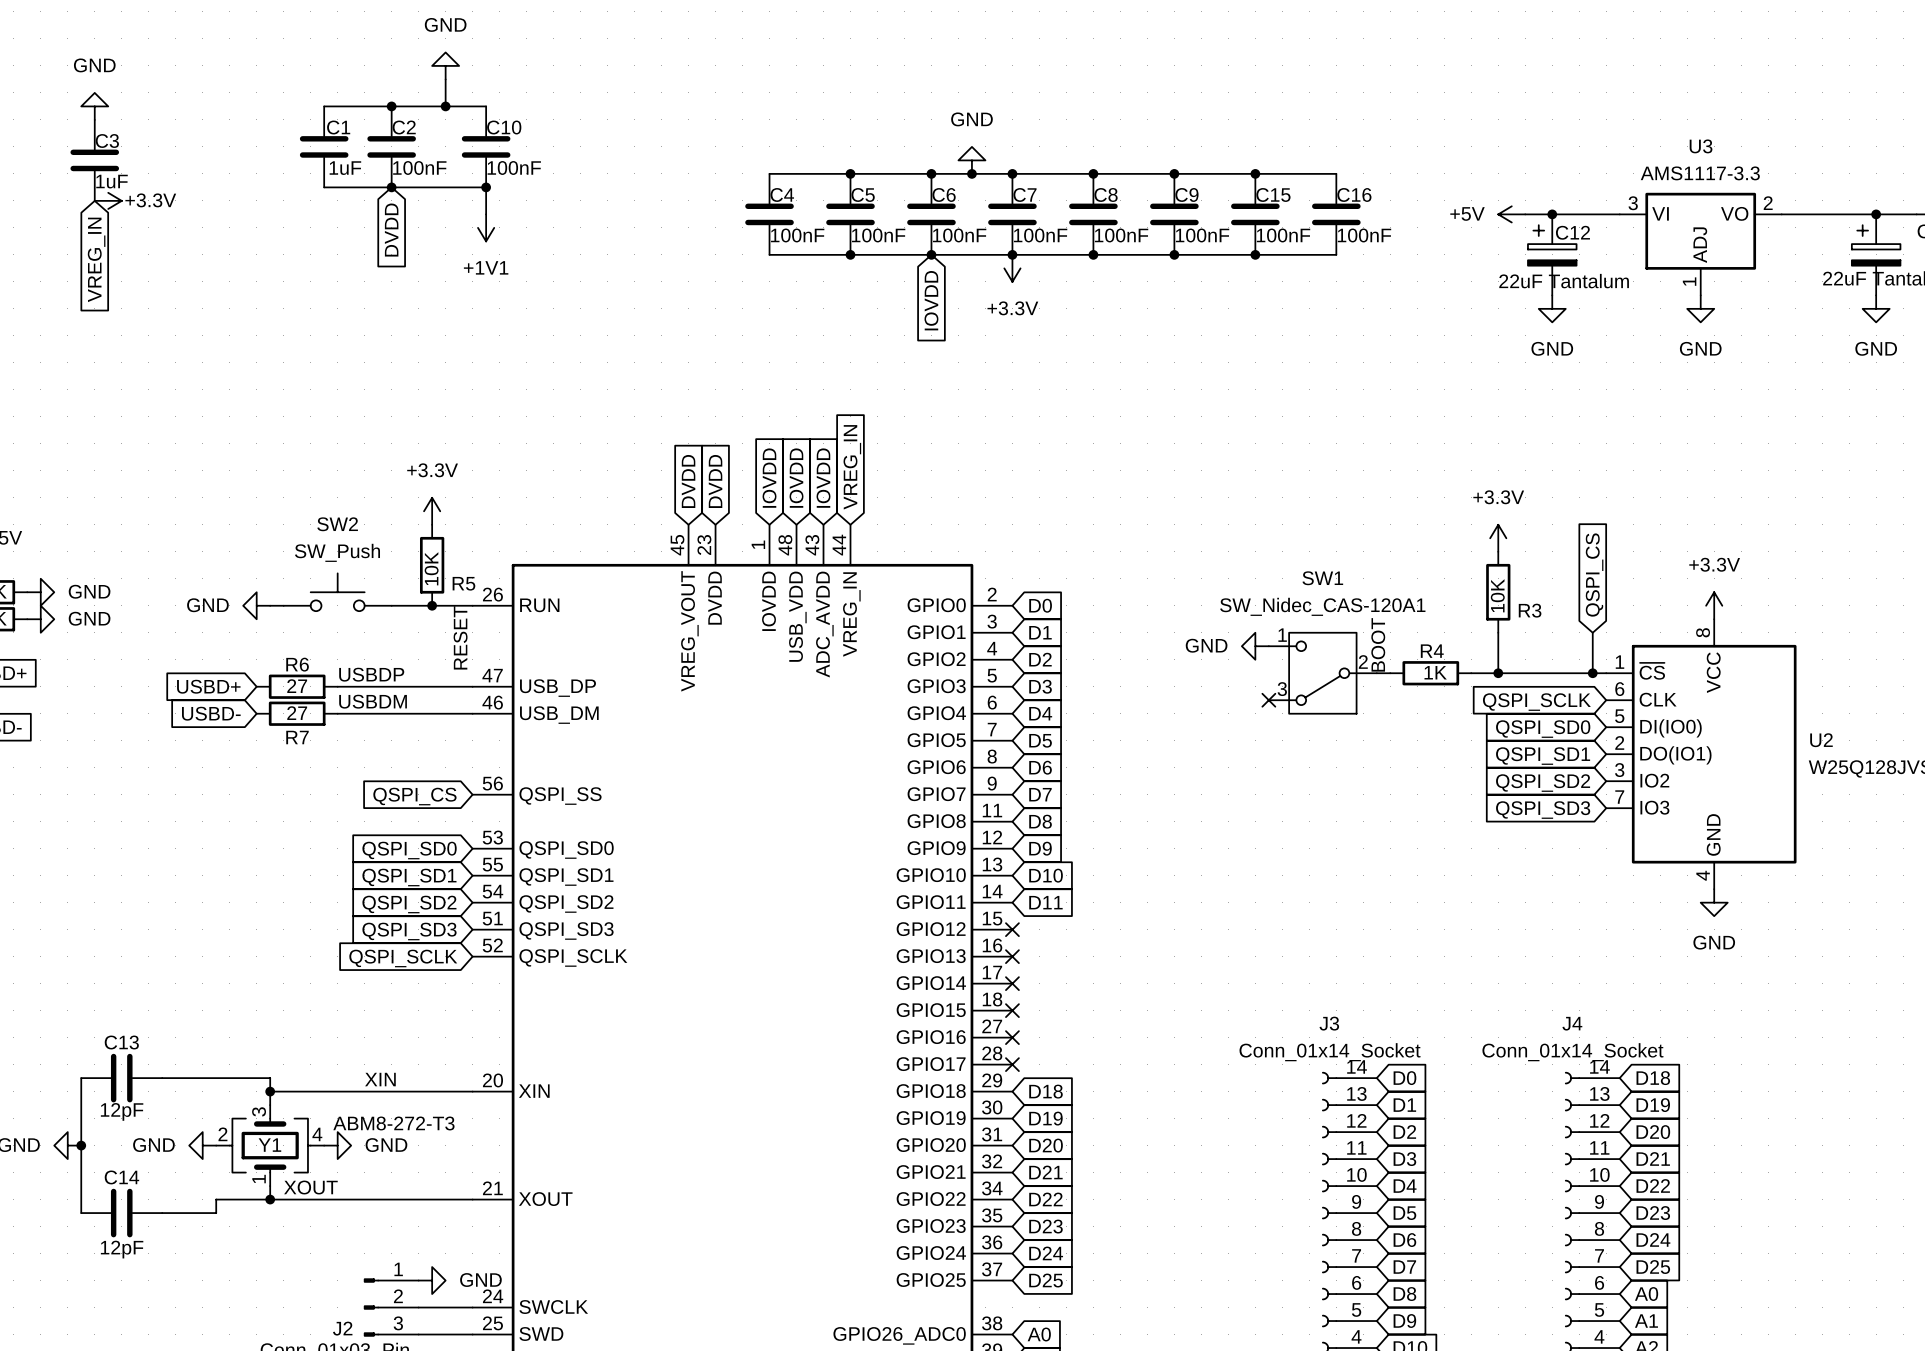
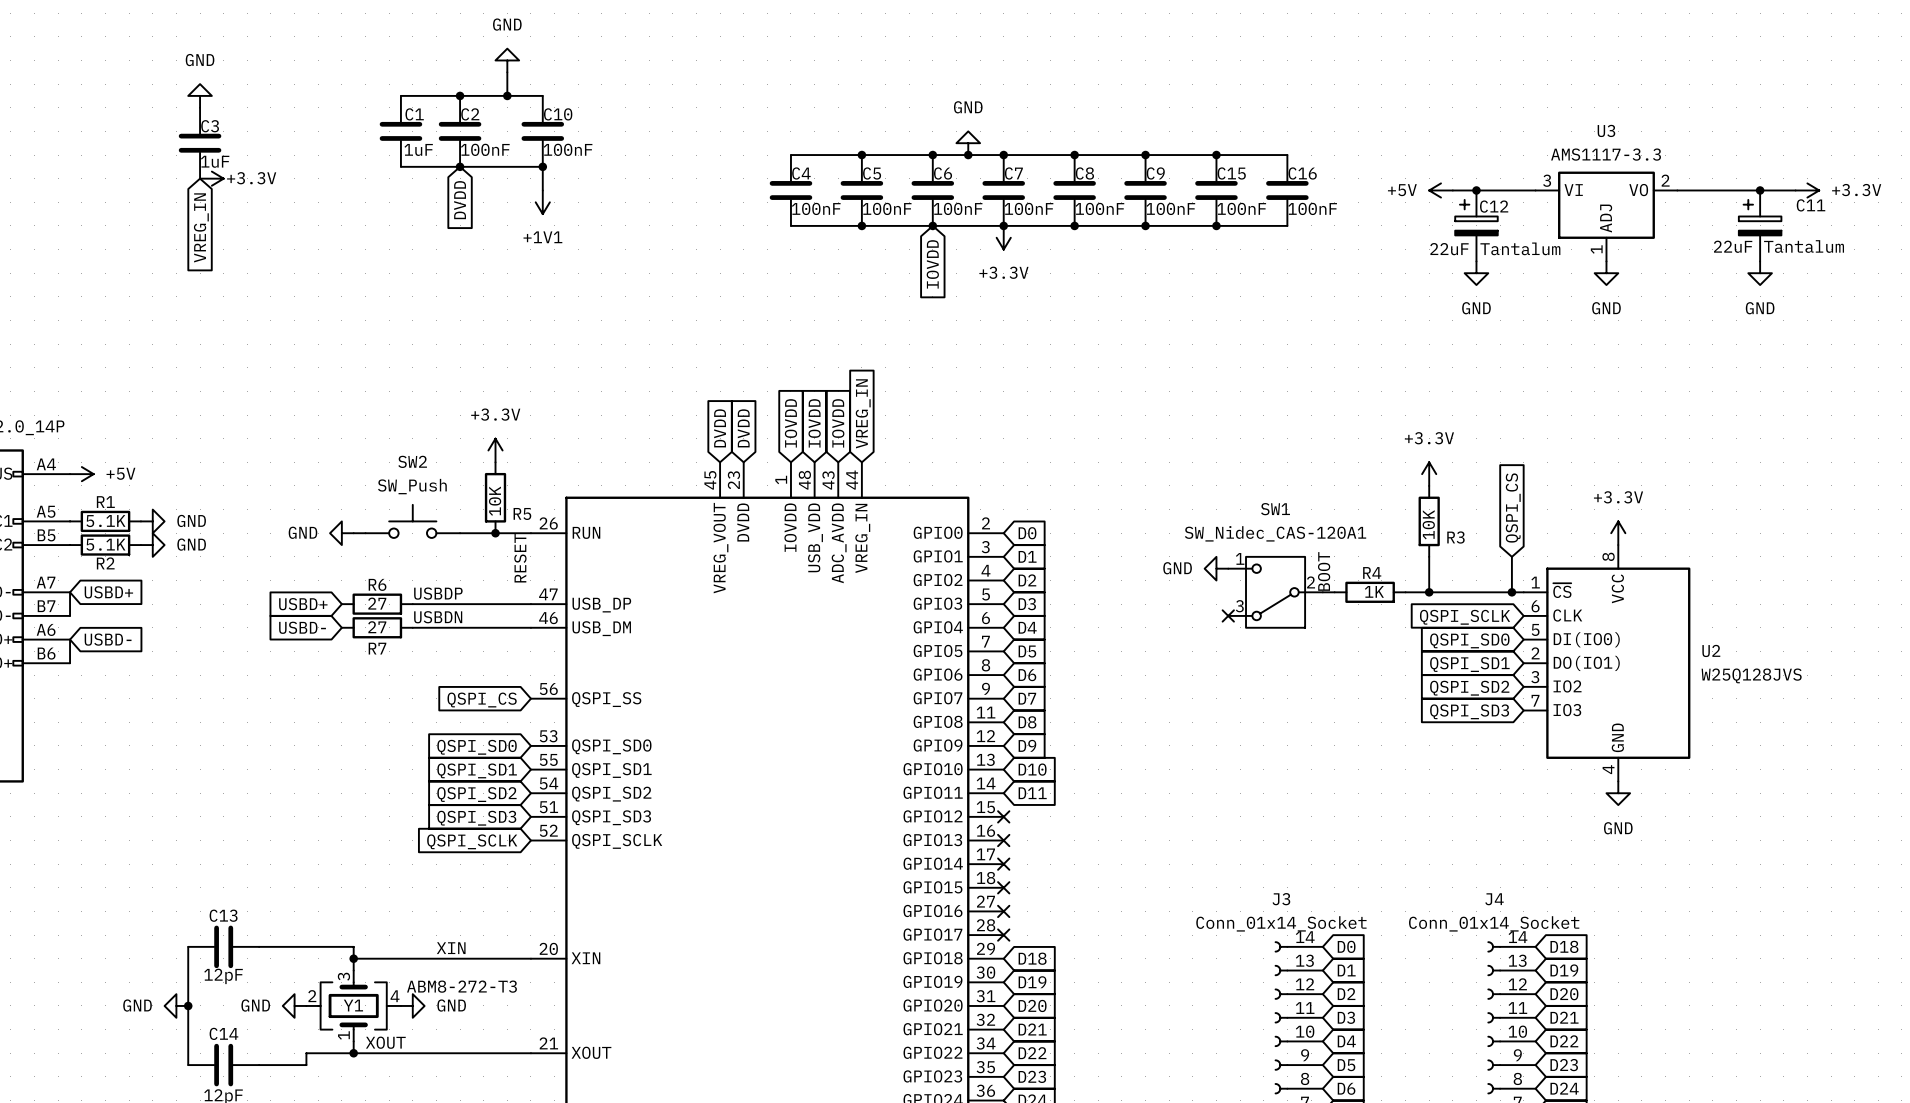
label: USBDM (373, 701) -> USBDN (438, 617)

